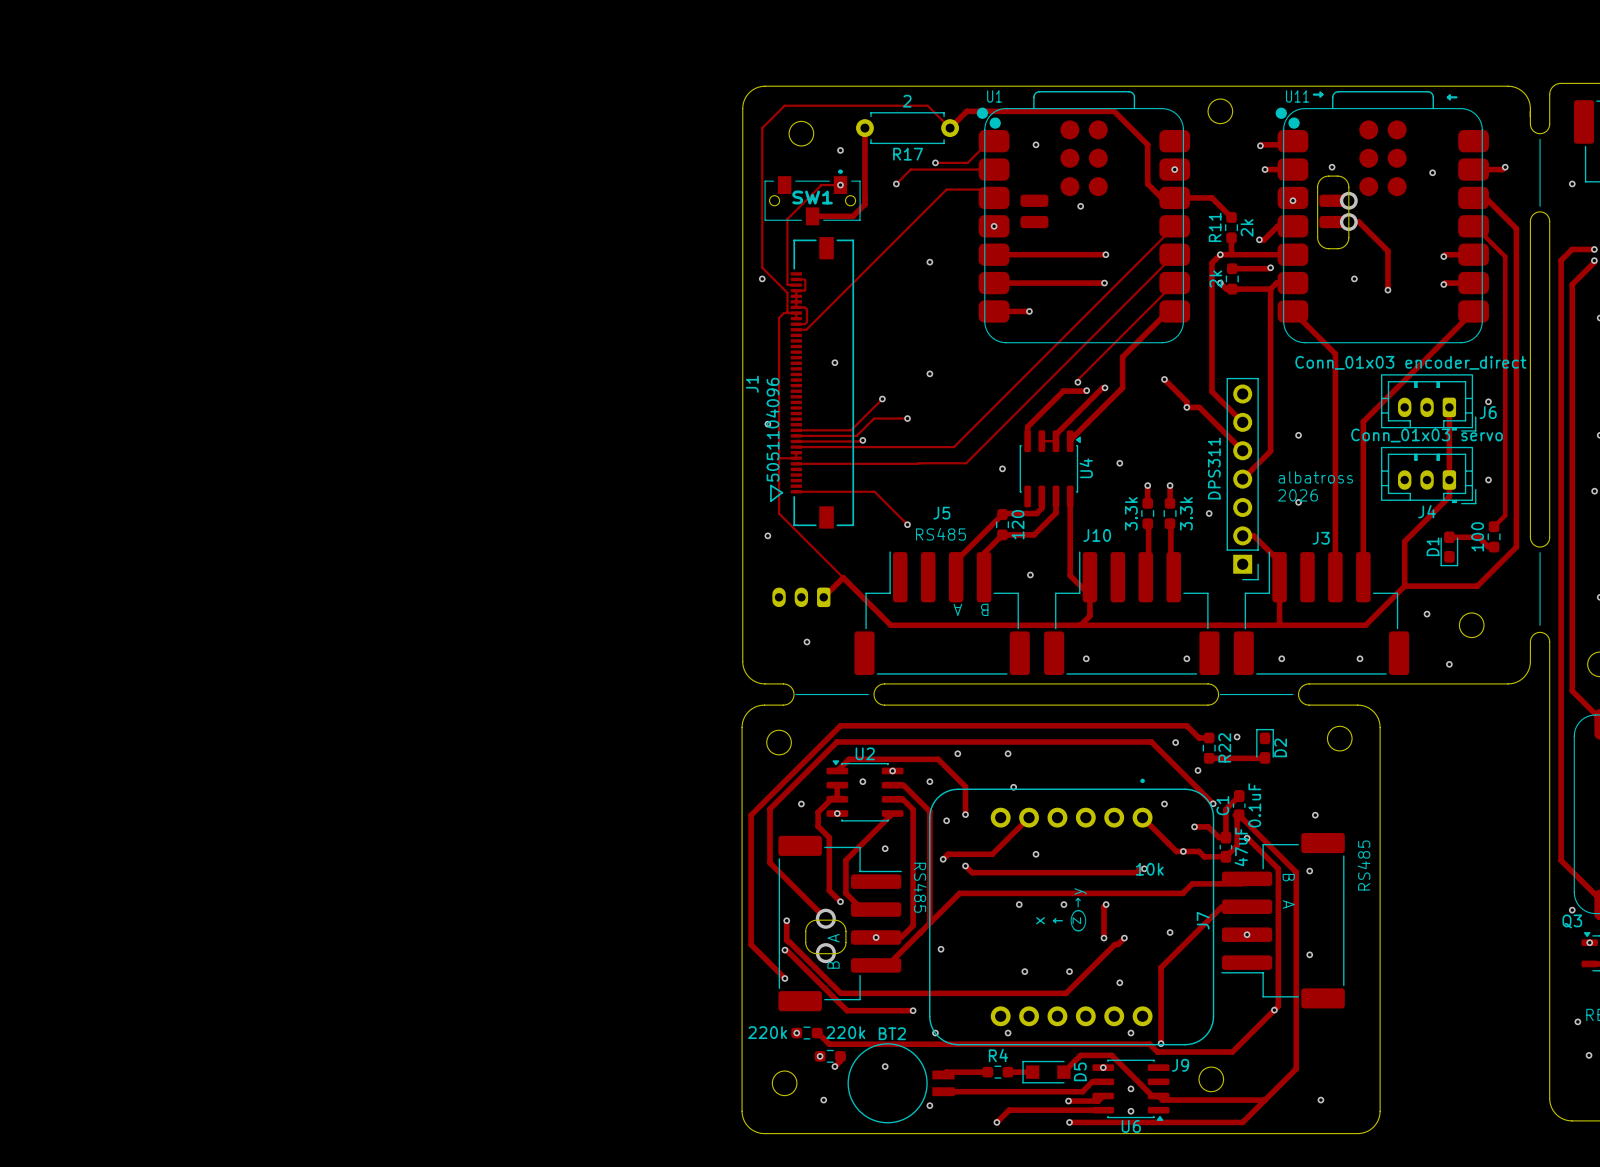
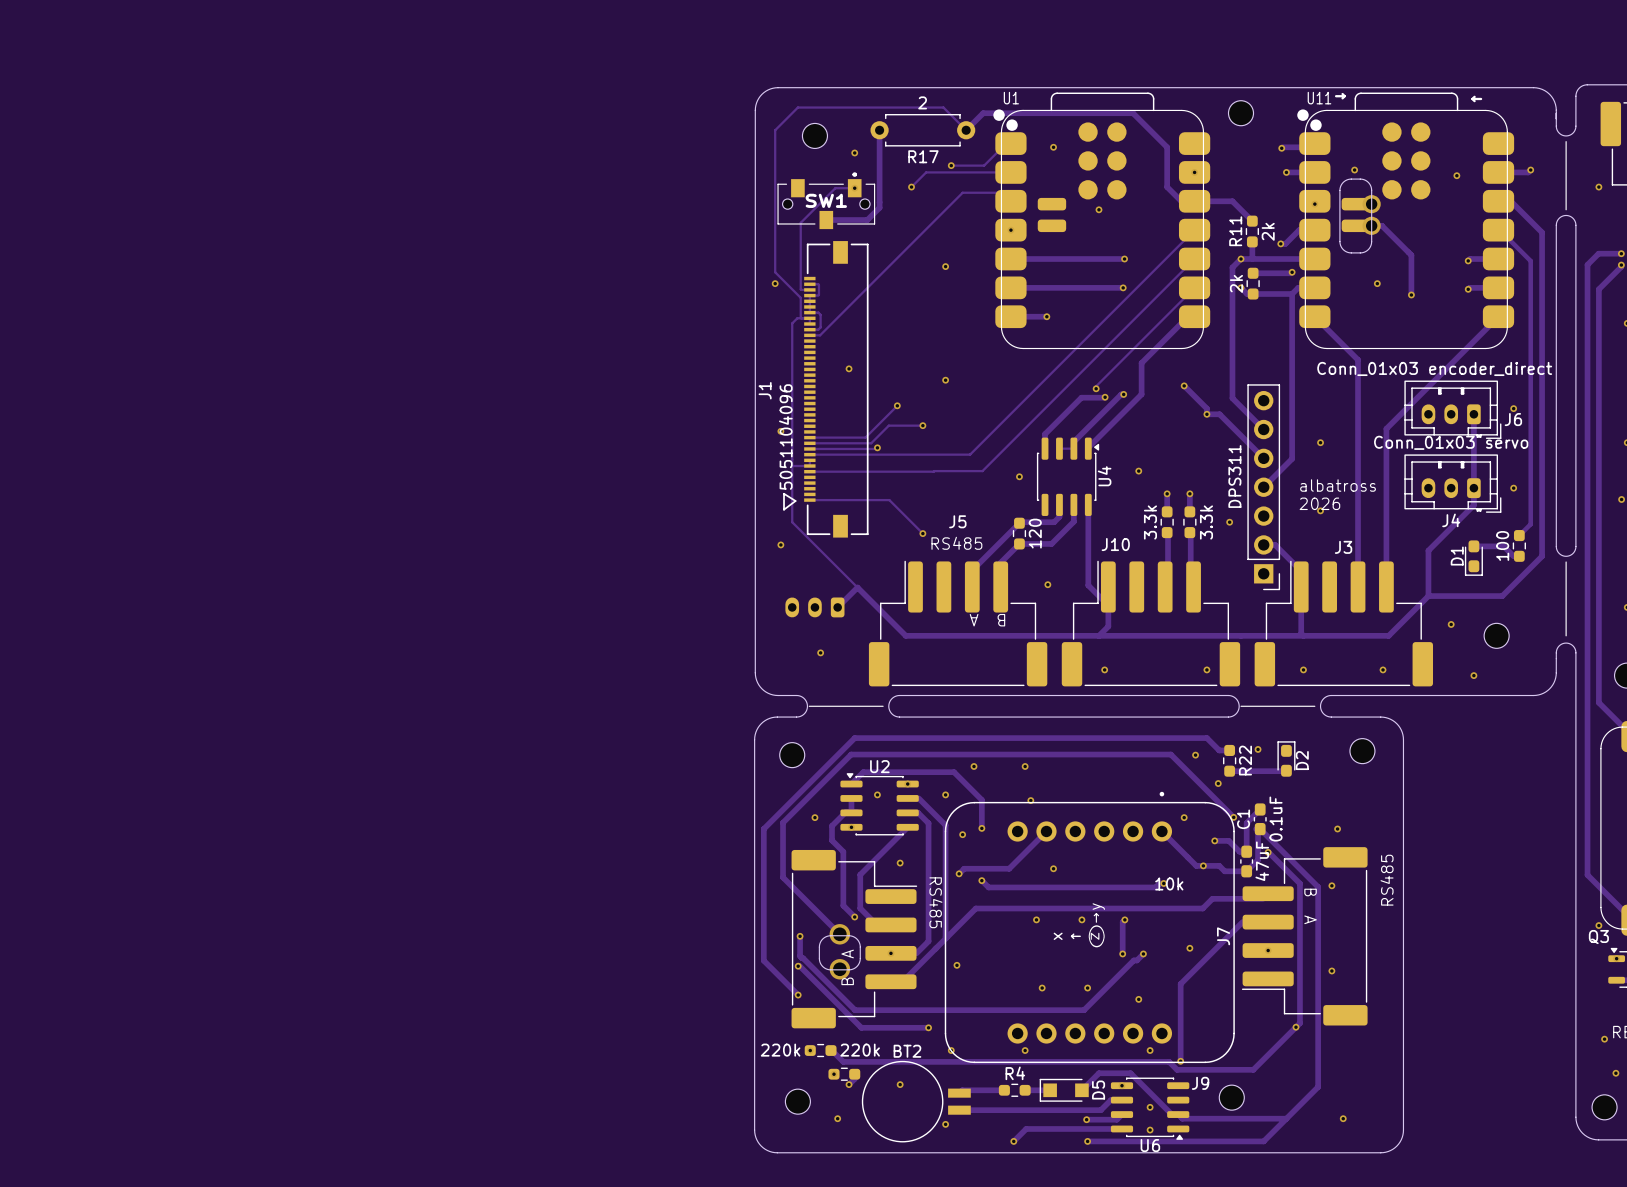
part: none -> (1604, 1107)

